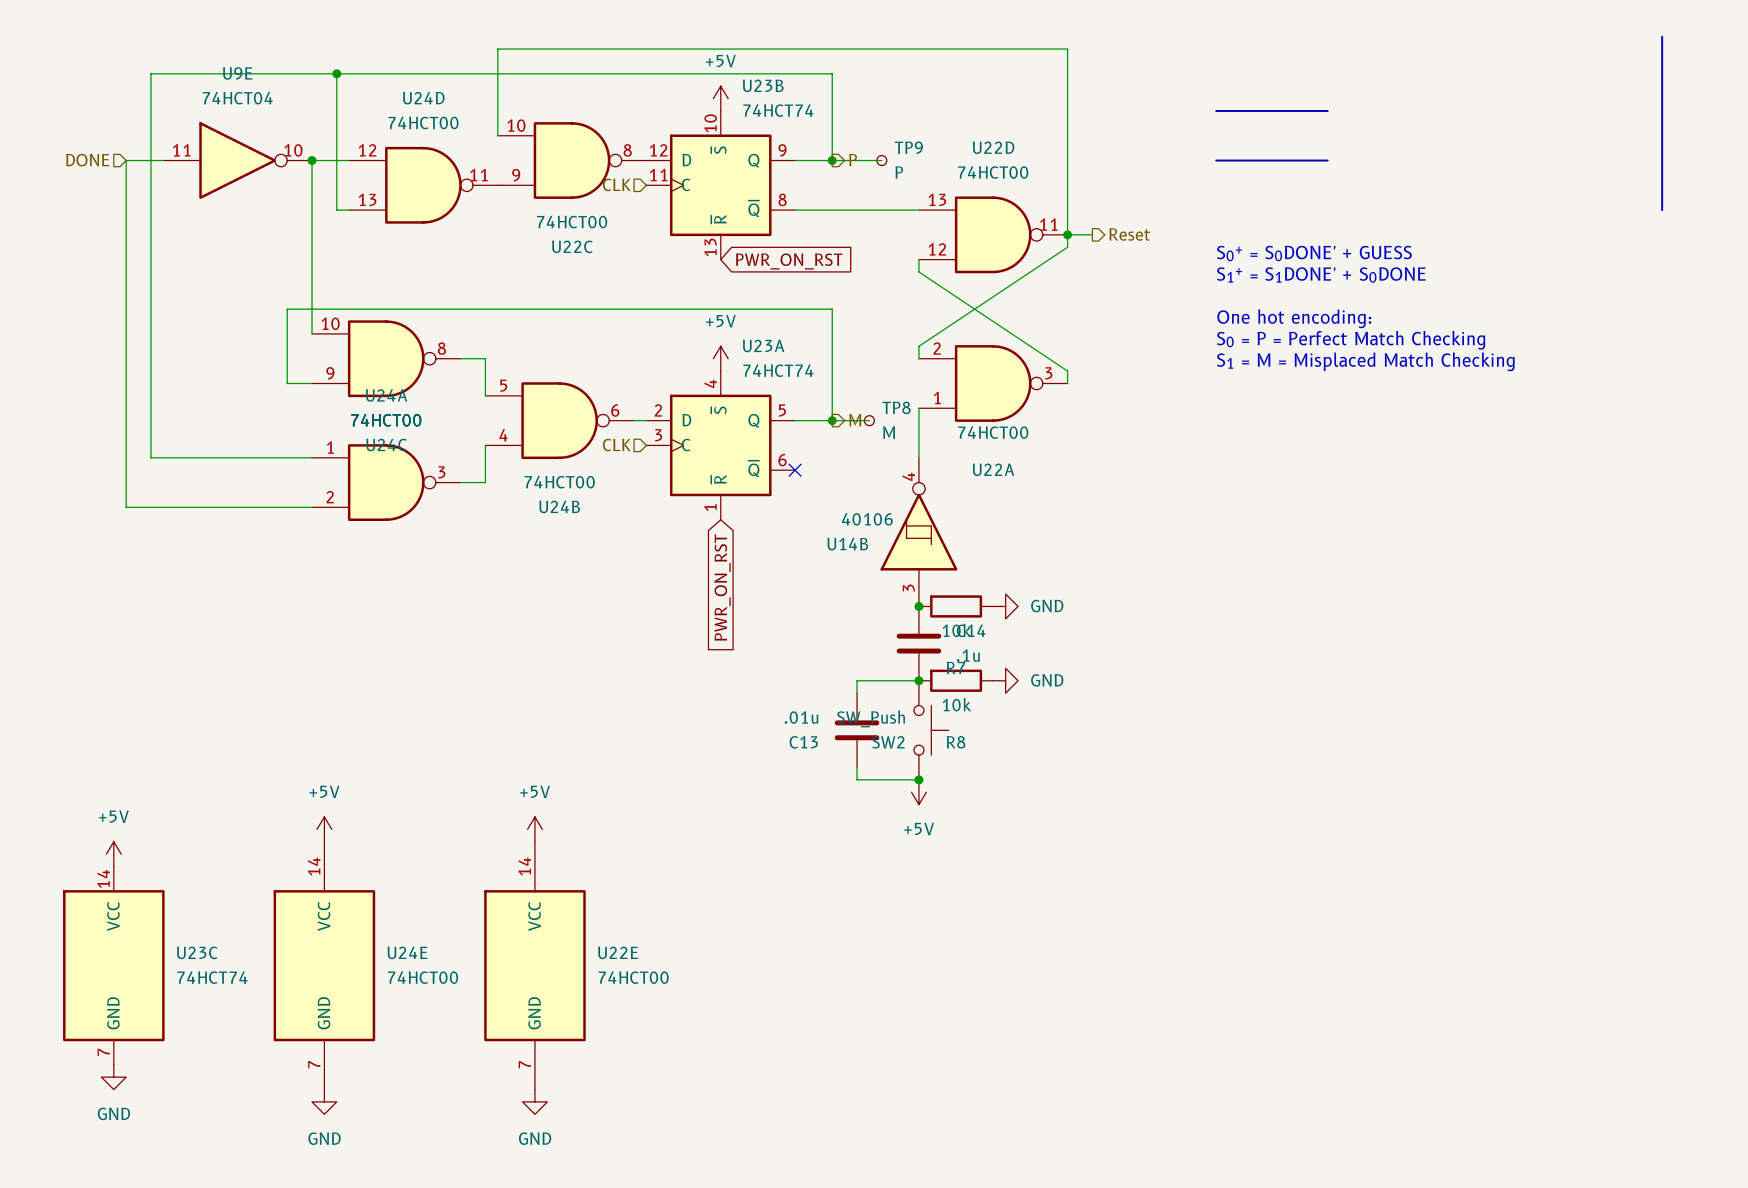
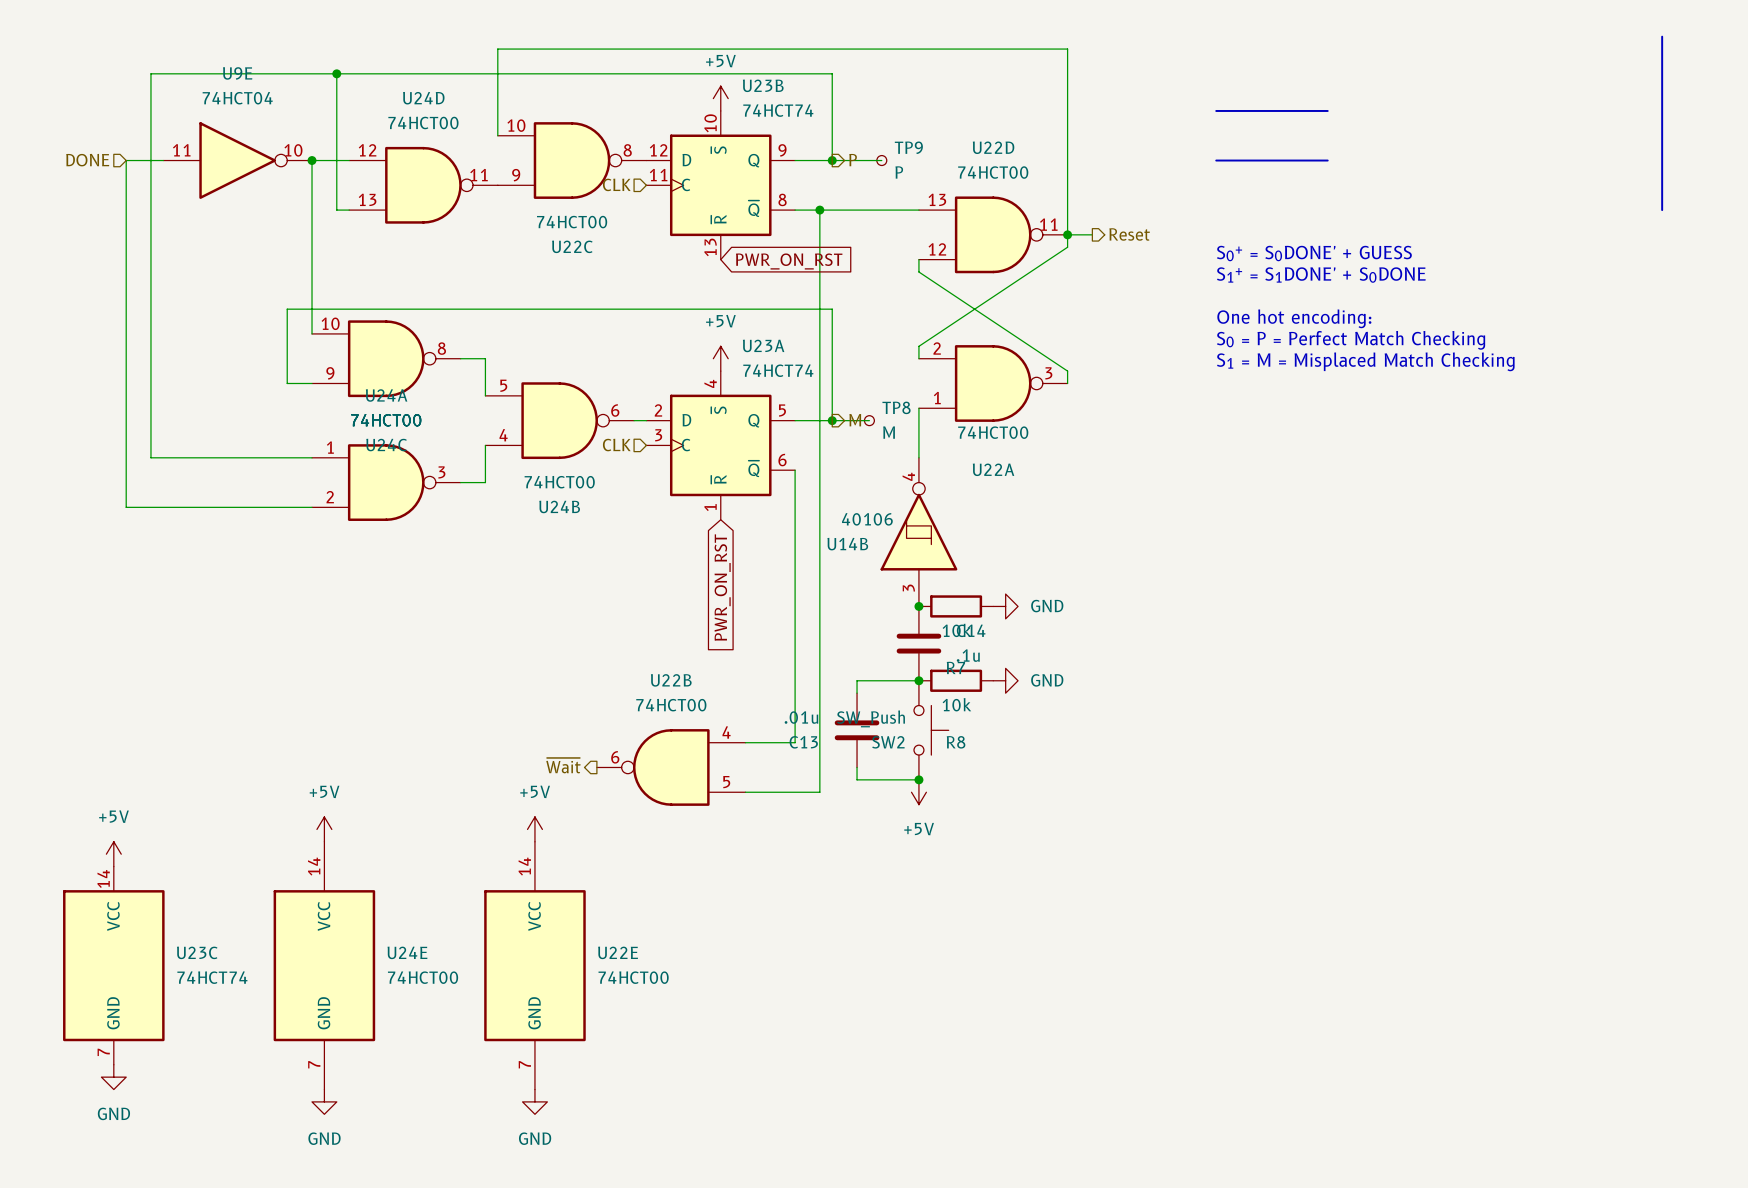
wire: none -> (819, 210) (819, 792) (745, 792)
junction: none -> (819, 210)
wire: none -> (795, 470) (795, 742) (745, 742)
no-connect mark: (795, 470) -> none
hierarchical label: none -> ~{Wait} (563, 765)
U22B: none -> 74HCT00 (671, 767)

